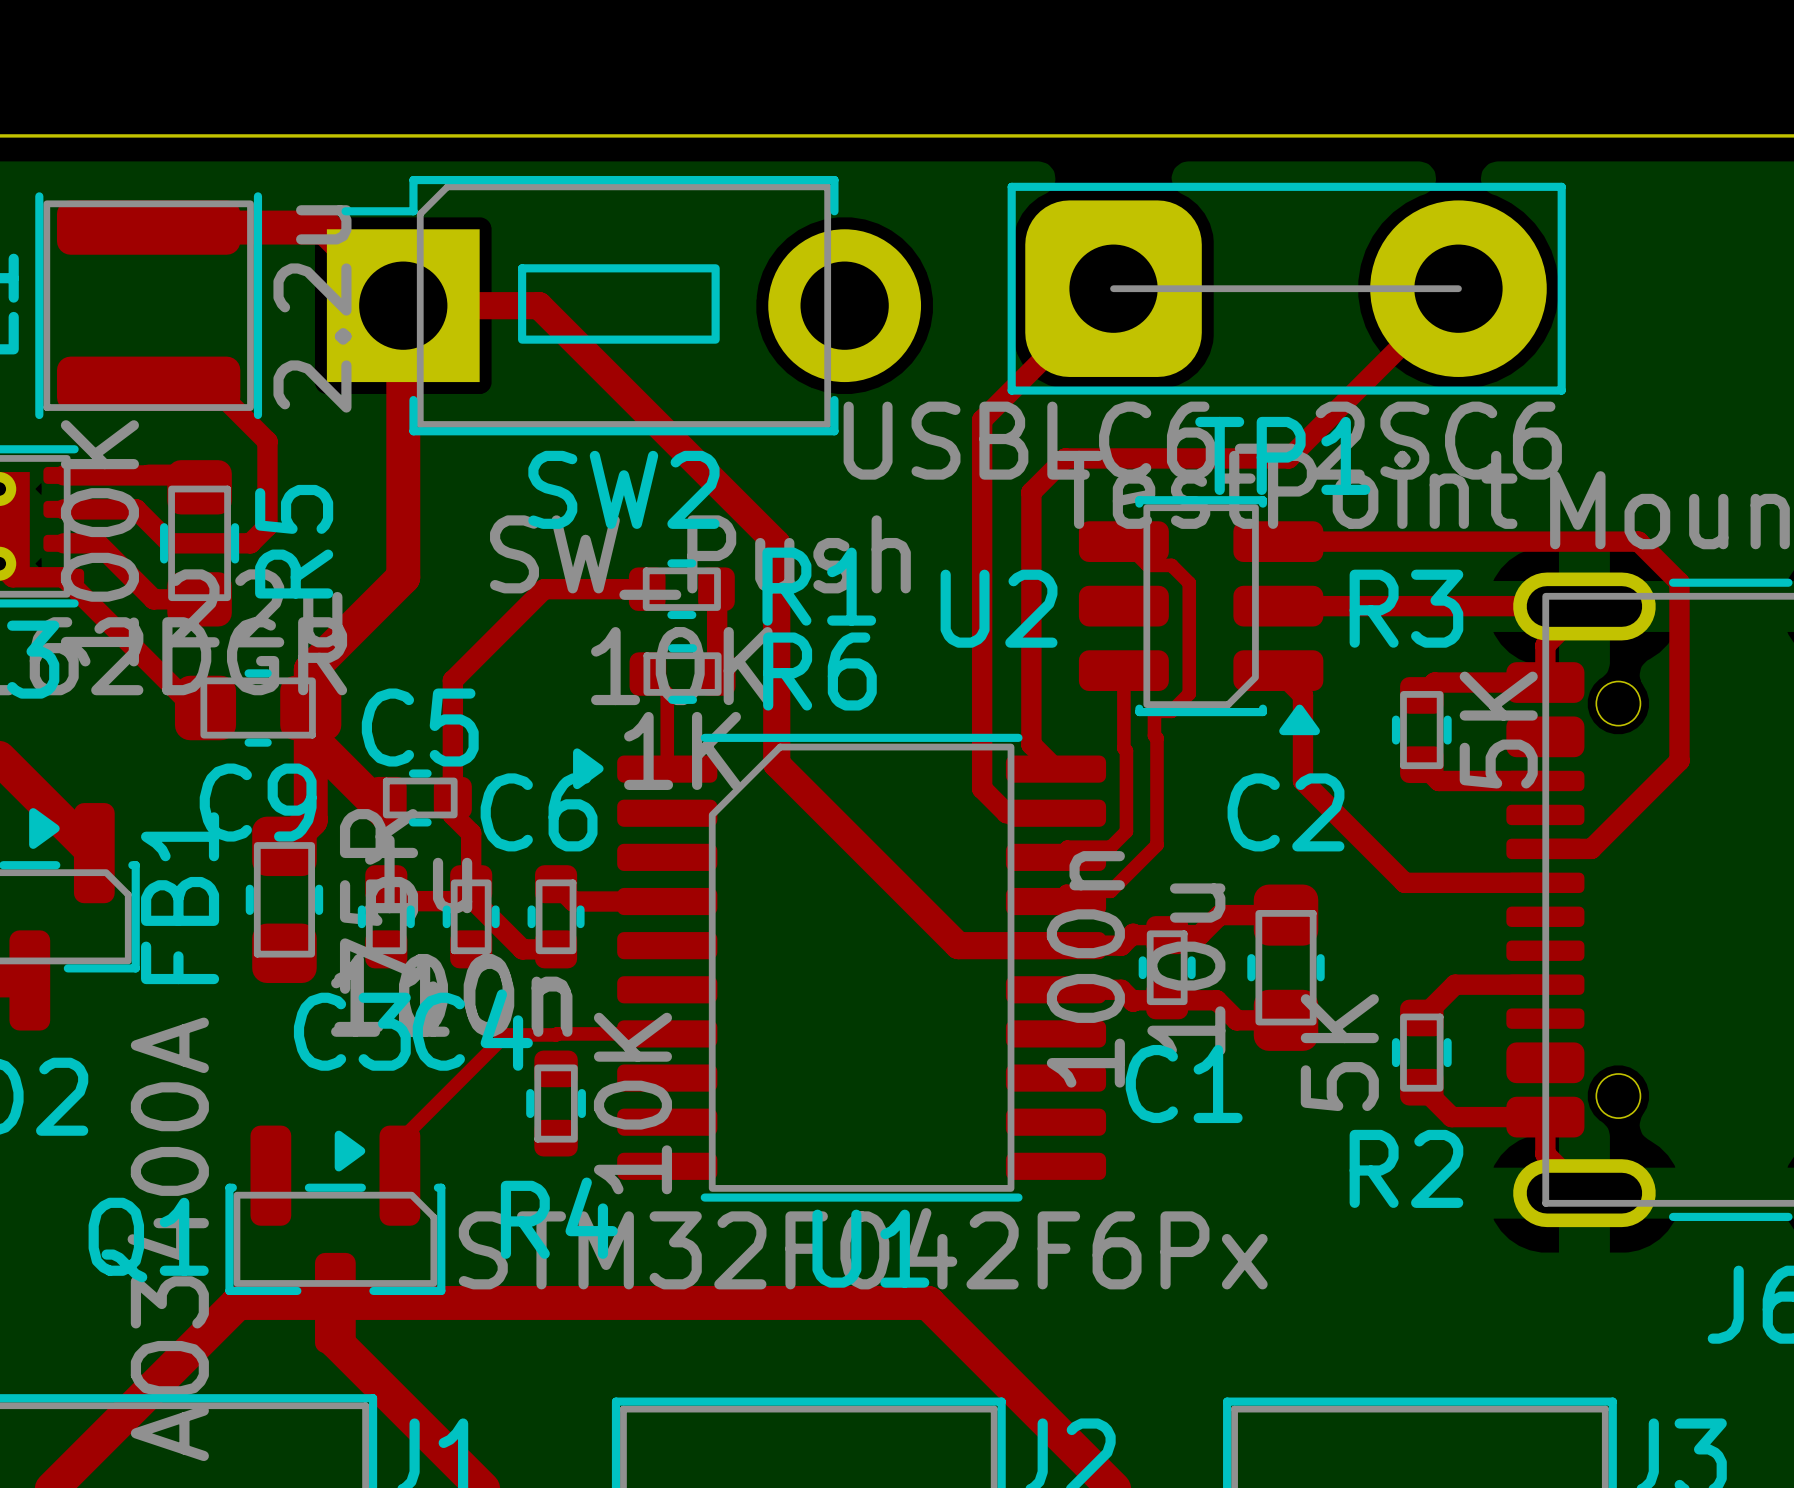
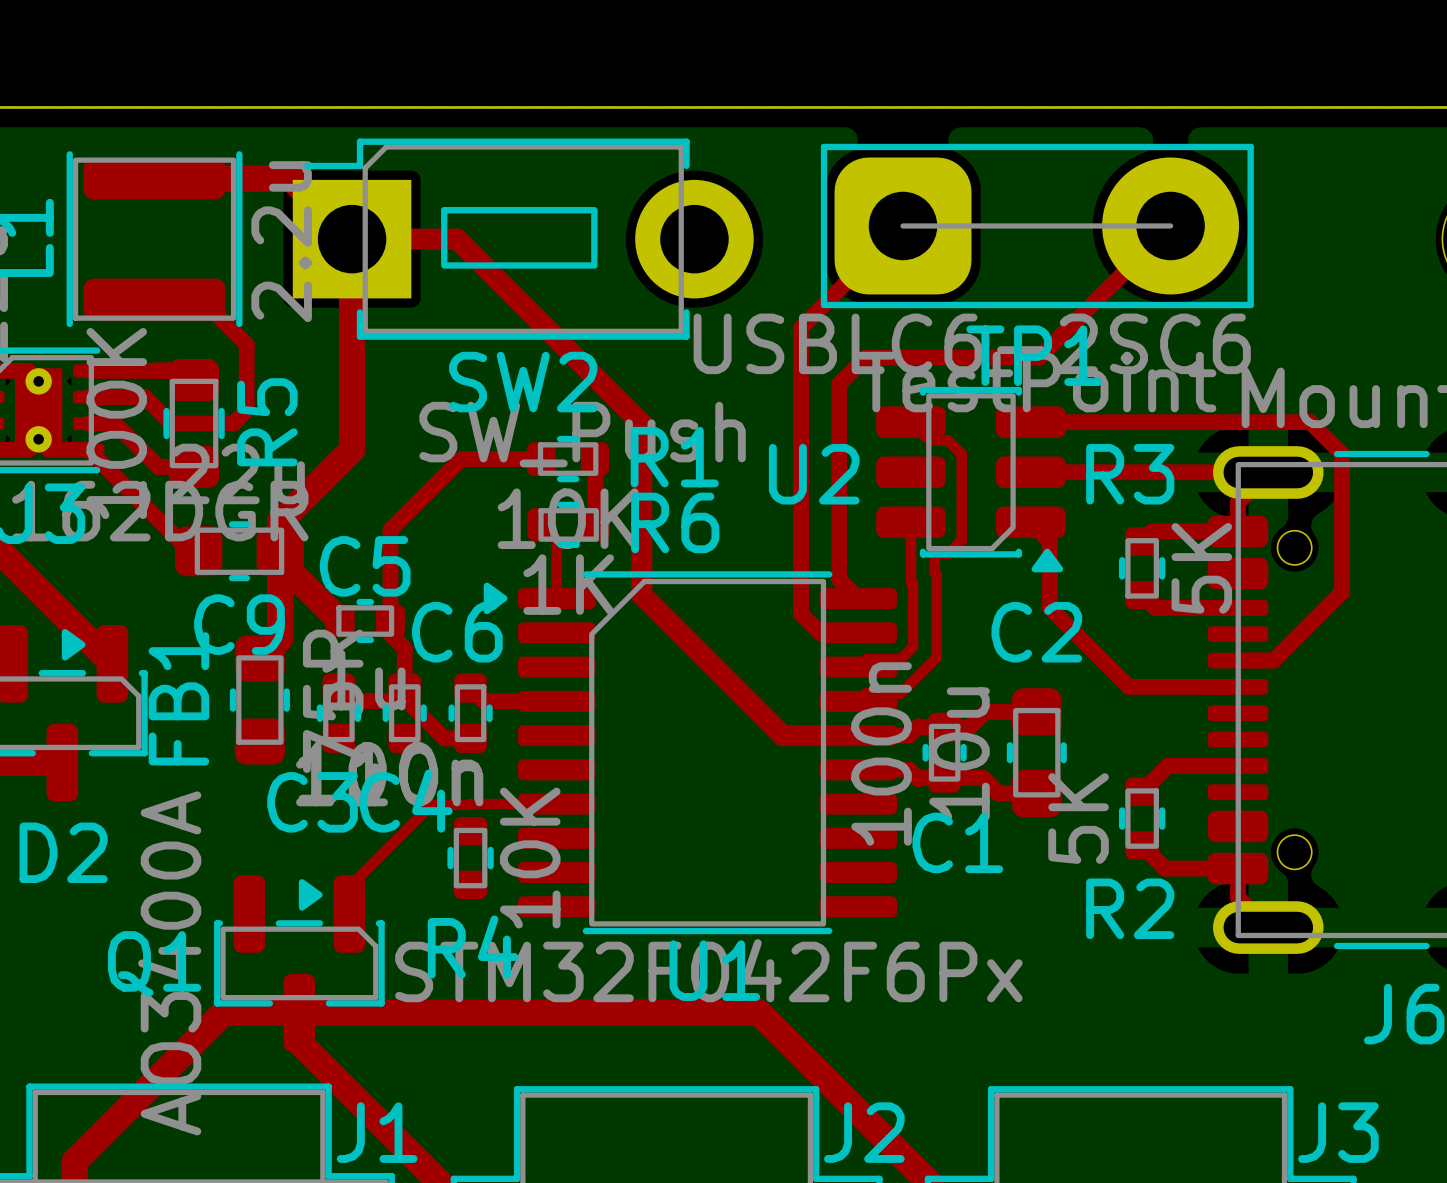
top track: (310, 738) (387, 814) -> (280, 561) (339, 621)

